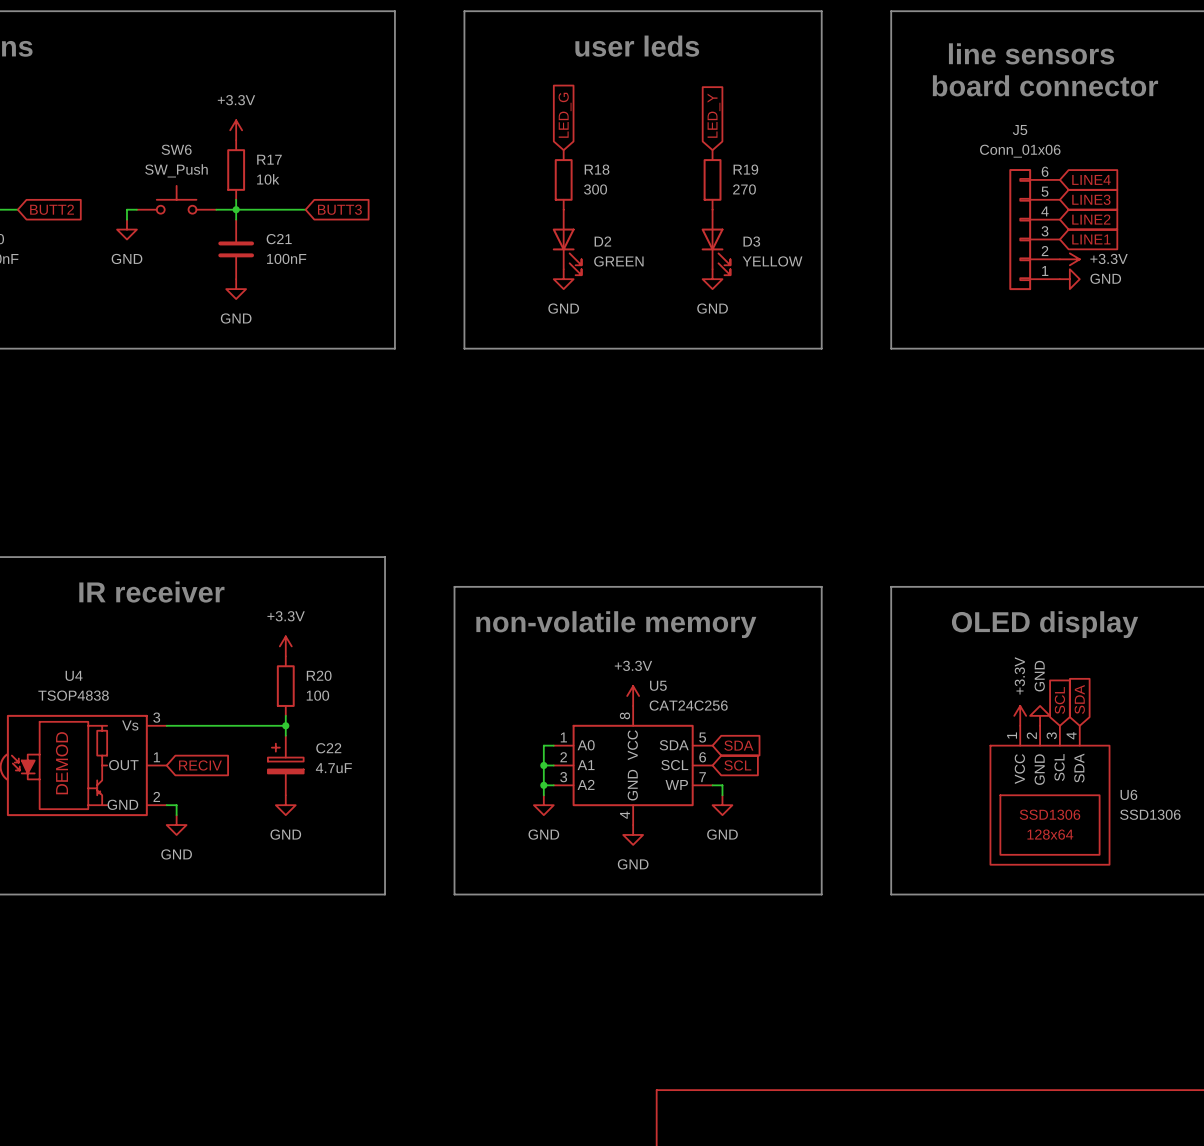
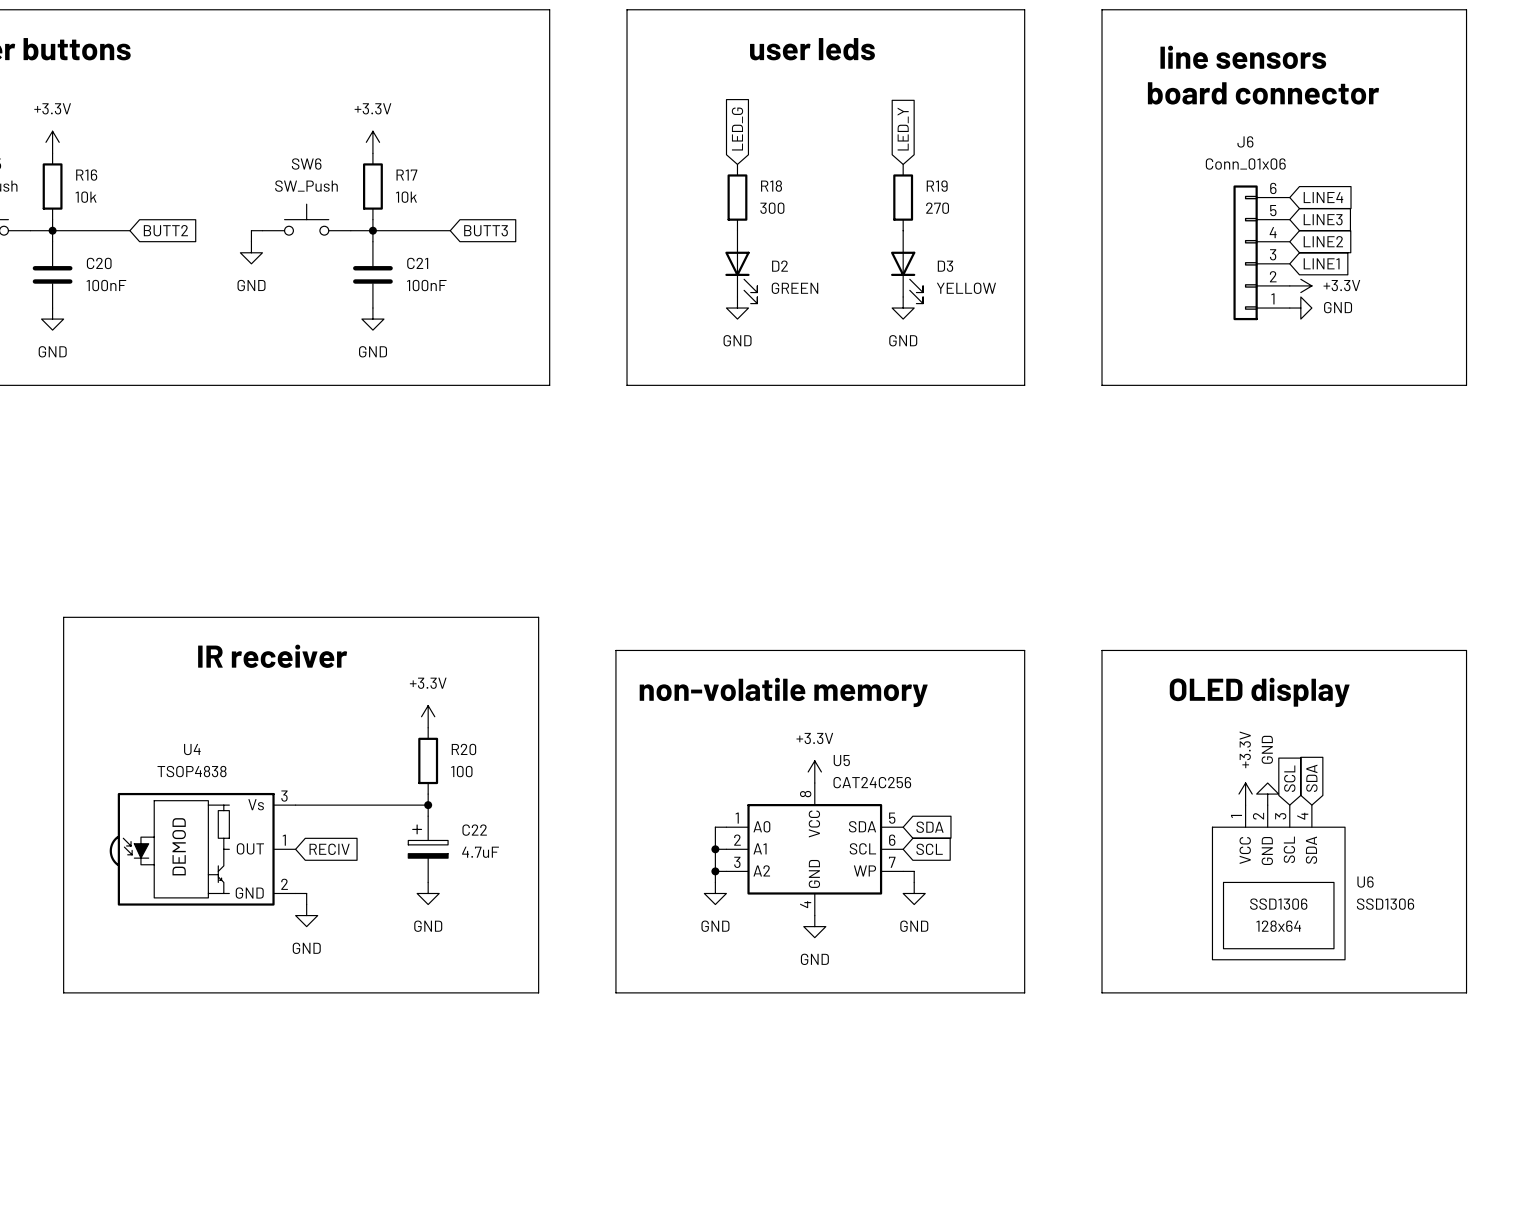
J5 name: J5 (1020, 130) -> J6 (1245, 141)

